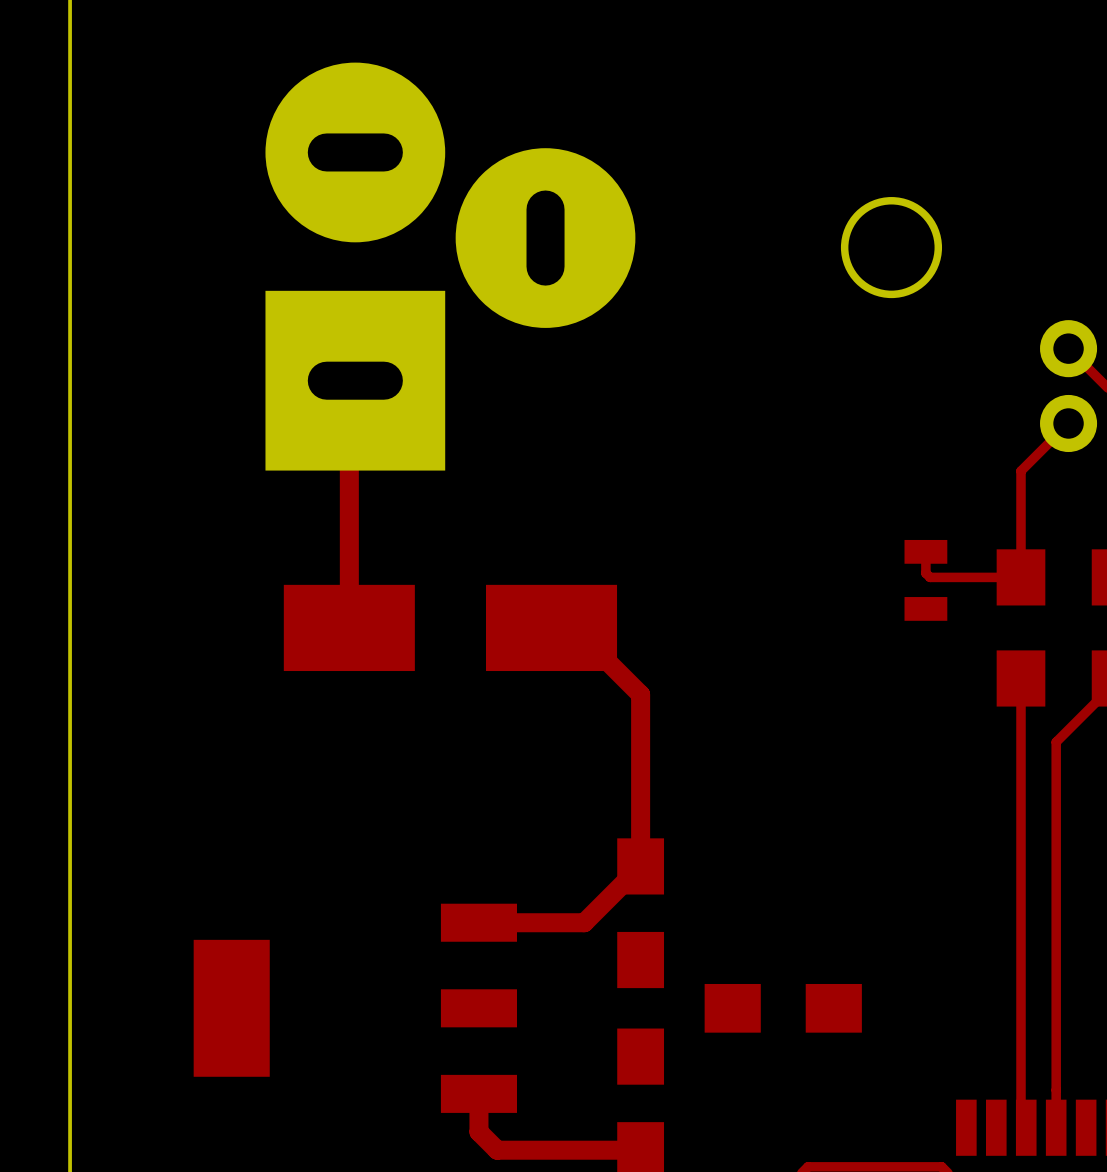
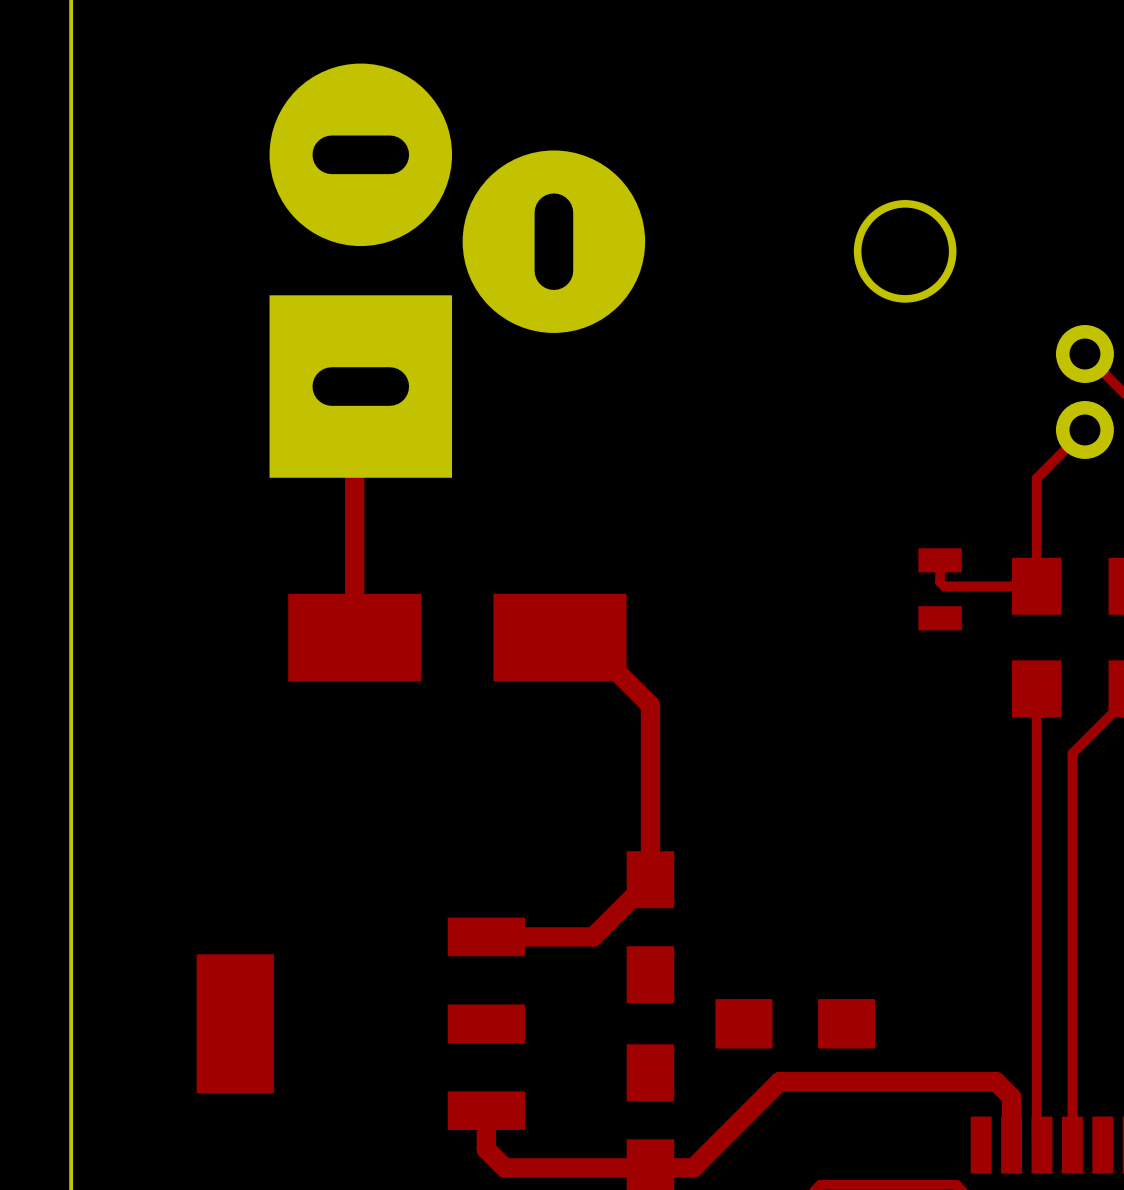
top track: none -> (1011, 1145) (1011, 1097) (996, 1081) (779, 1081) (693, 1167) (650, 1167)

